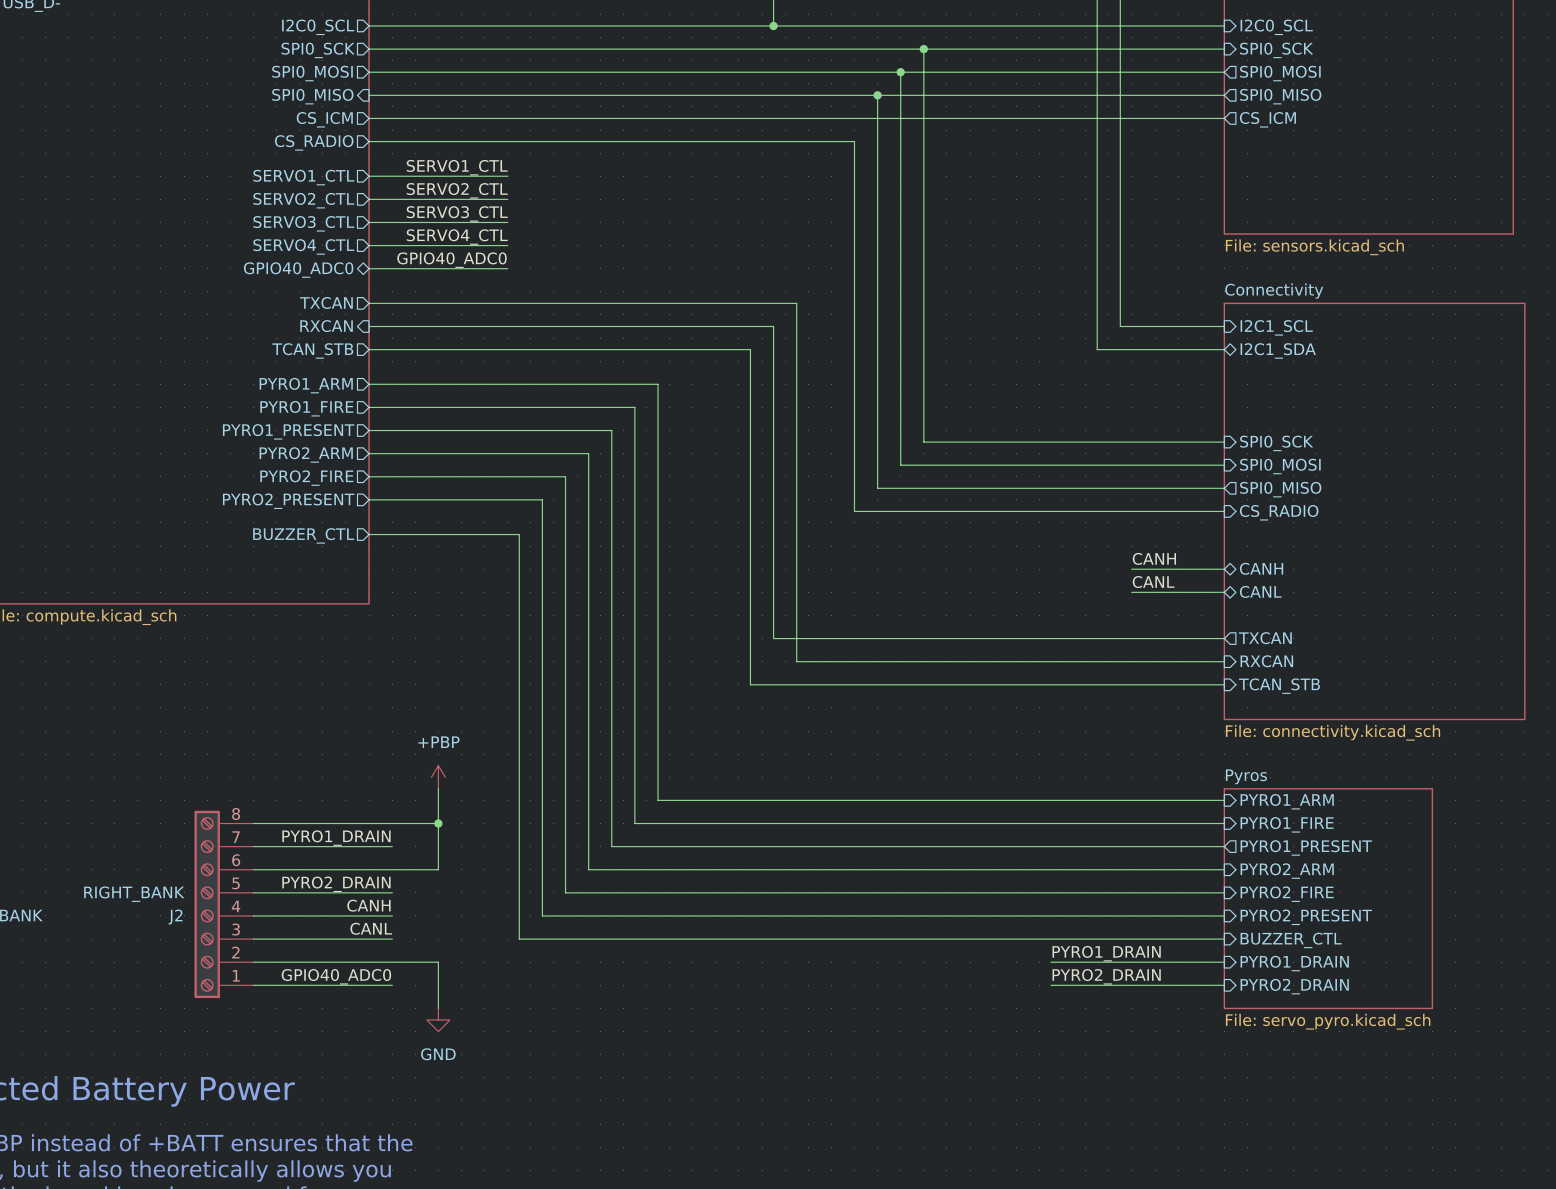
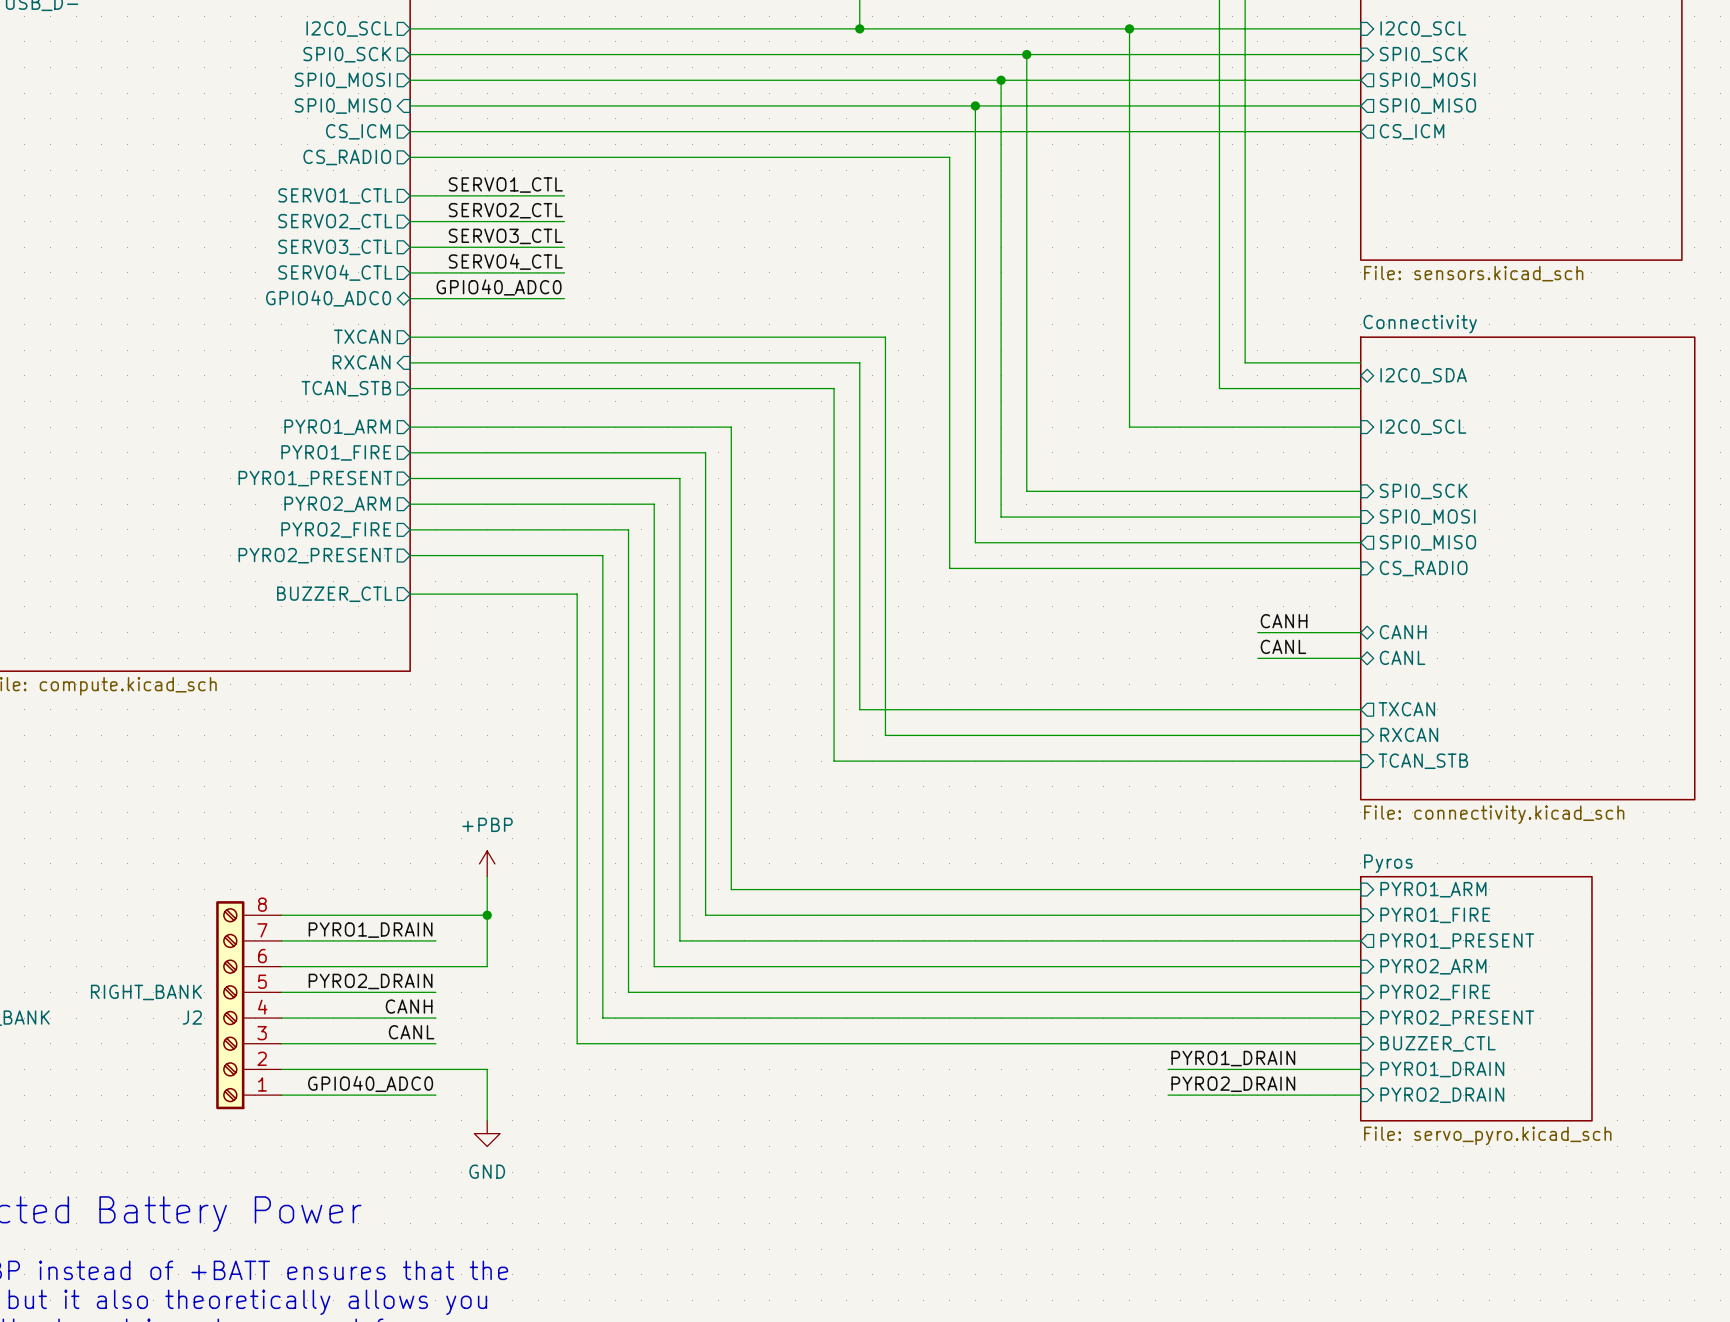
wire: none -> (1129, 28) (1129, 427) (1360, 427)
junction: none -> (1129, 28)
sheet pin: I2C1_SCL (1276, 327) -> none
sheet pin: none -> I2C0_SDA (1423, 375)
sheet pin: I2C1_SDA (1278, 350) -> none
sheet pin: none -> I2C0_SCL (1423, 427)

